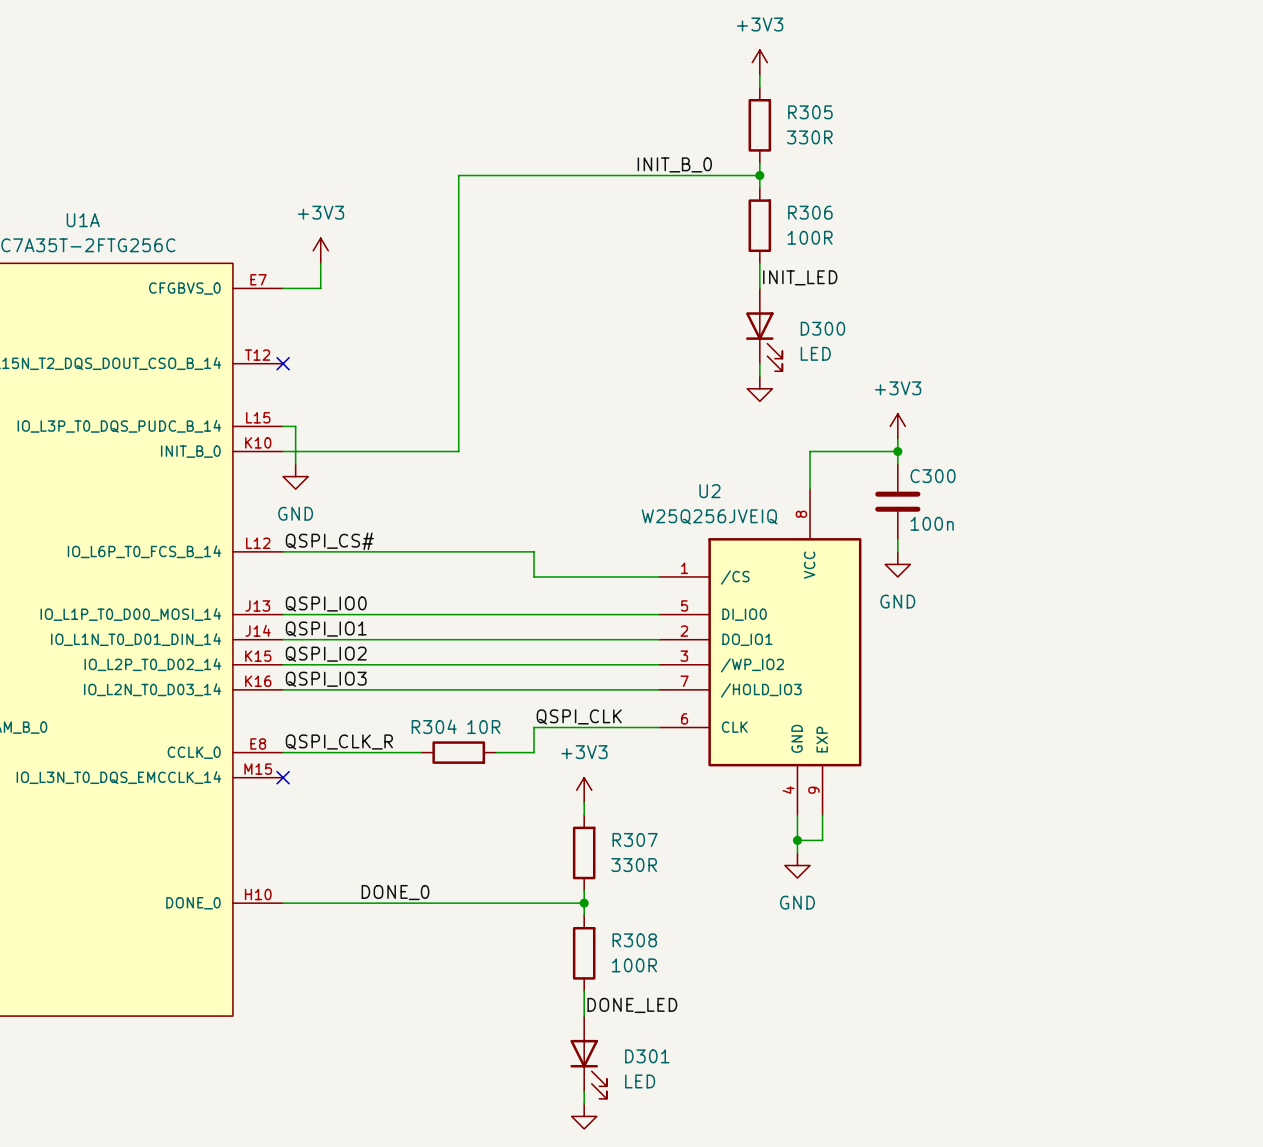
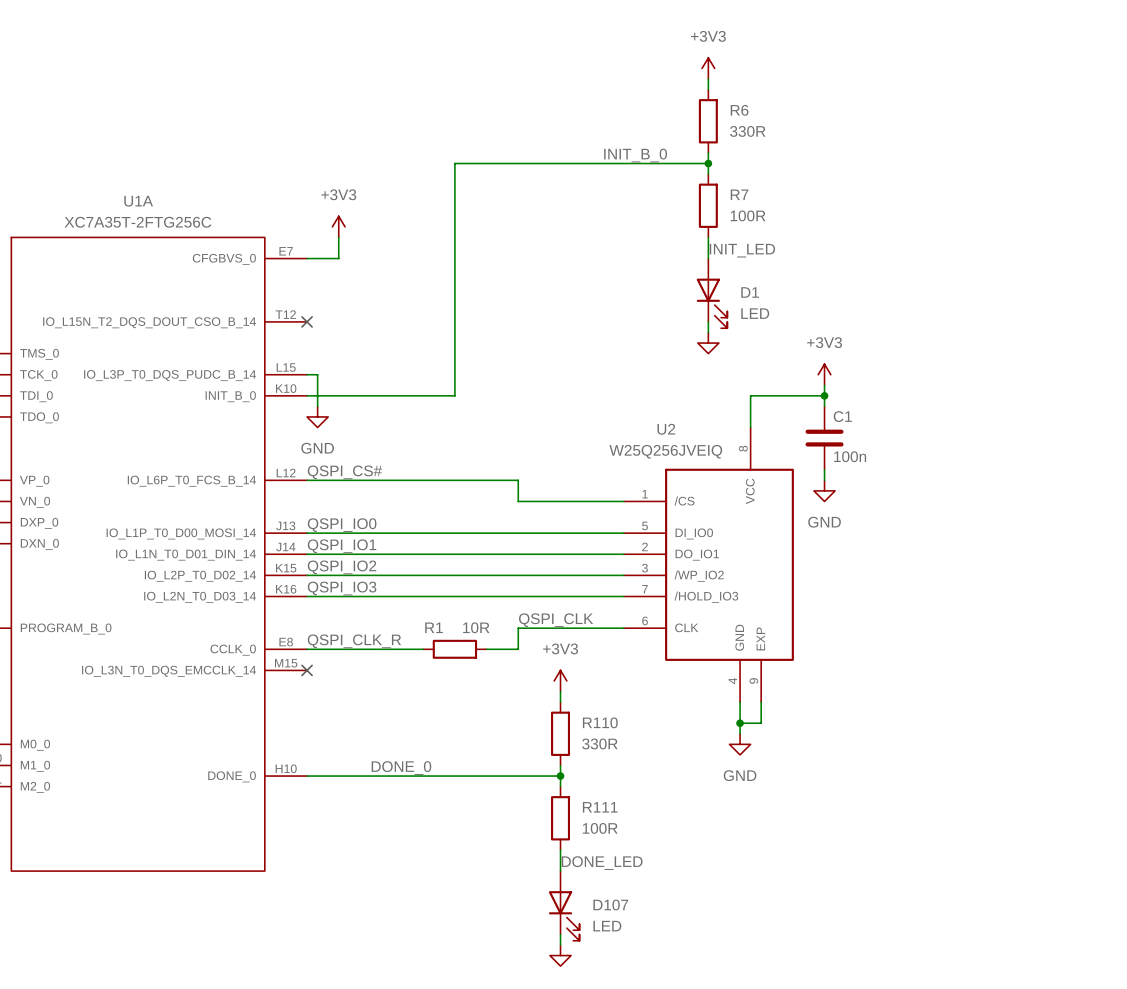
R305 name: R305 (810, 112) -> R6 (739, 110)
R306 name: R306 (810, 212) -> R7 (739, 194)
D300 name: D300 (822, 328) -> D1 (750, 292)
C300 name: C300 (933, 476) -> C1 (842, 416)
R304 name: R304 (434, 726) -> R1 (434, 627)
R307 name: R307 (635, 839) -> R110 (600, 722)
R308 name: R308 (634, 940) -> R111 (600, 807)
D301 name: D301 (647, 1056) -> D107 (610, 905)

